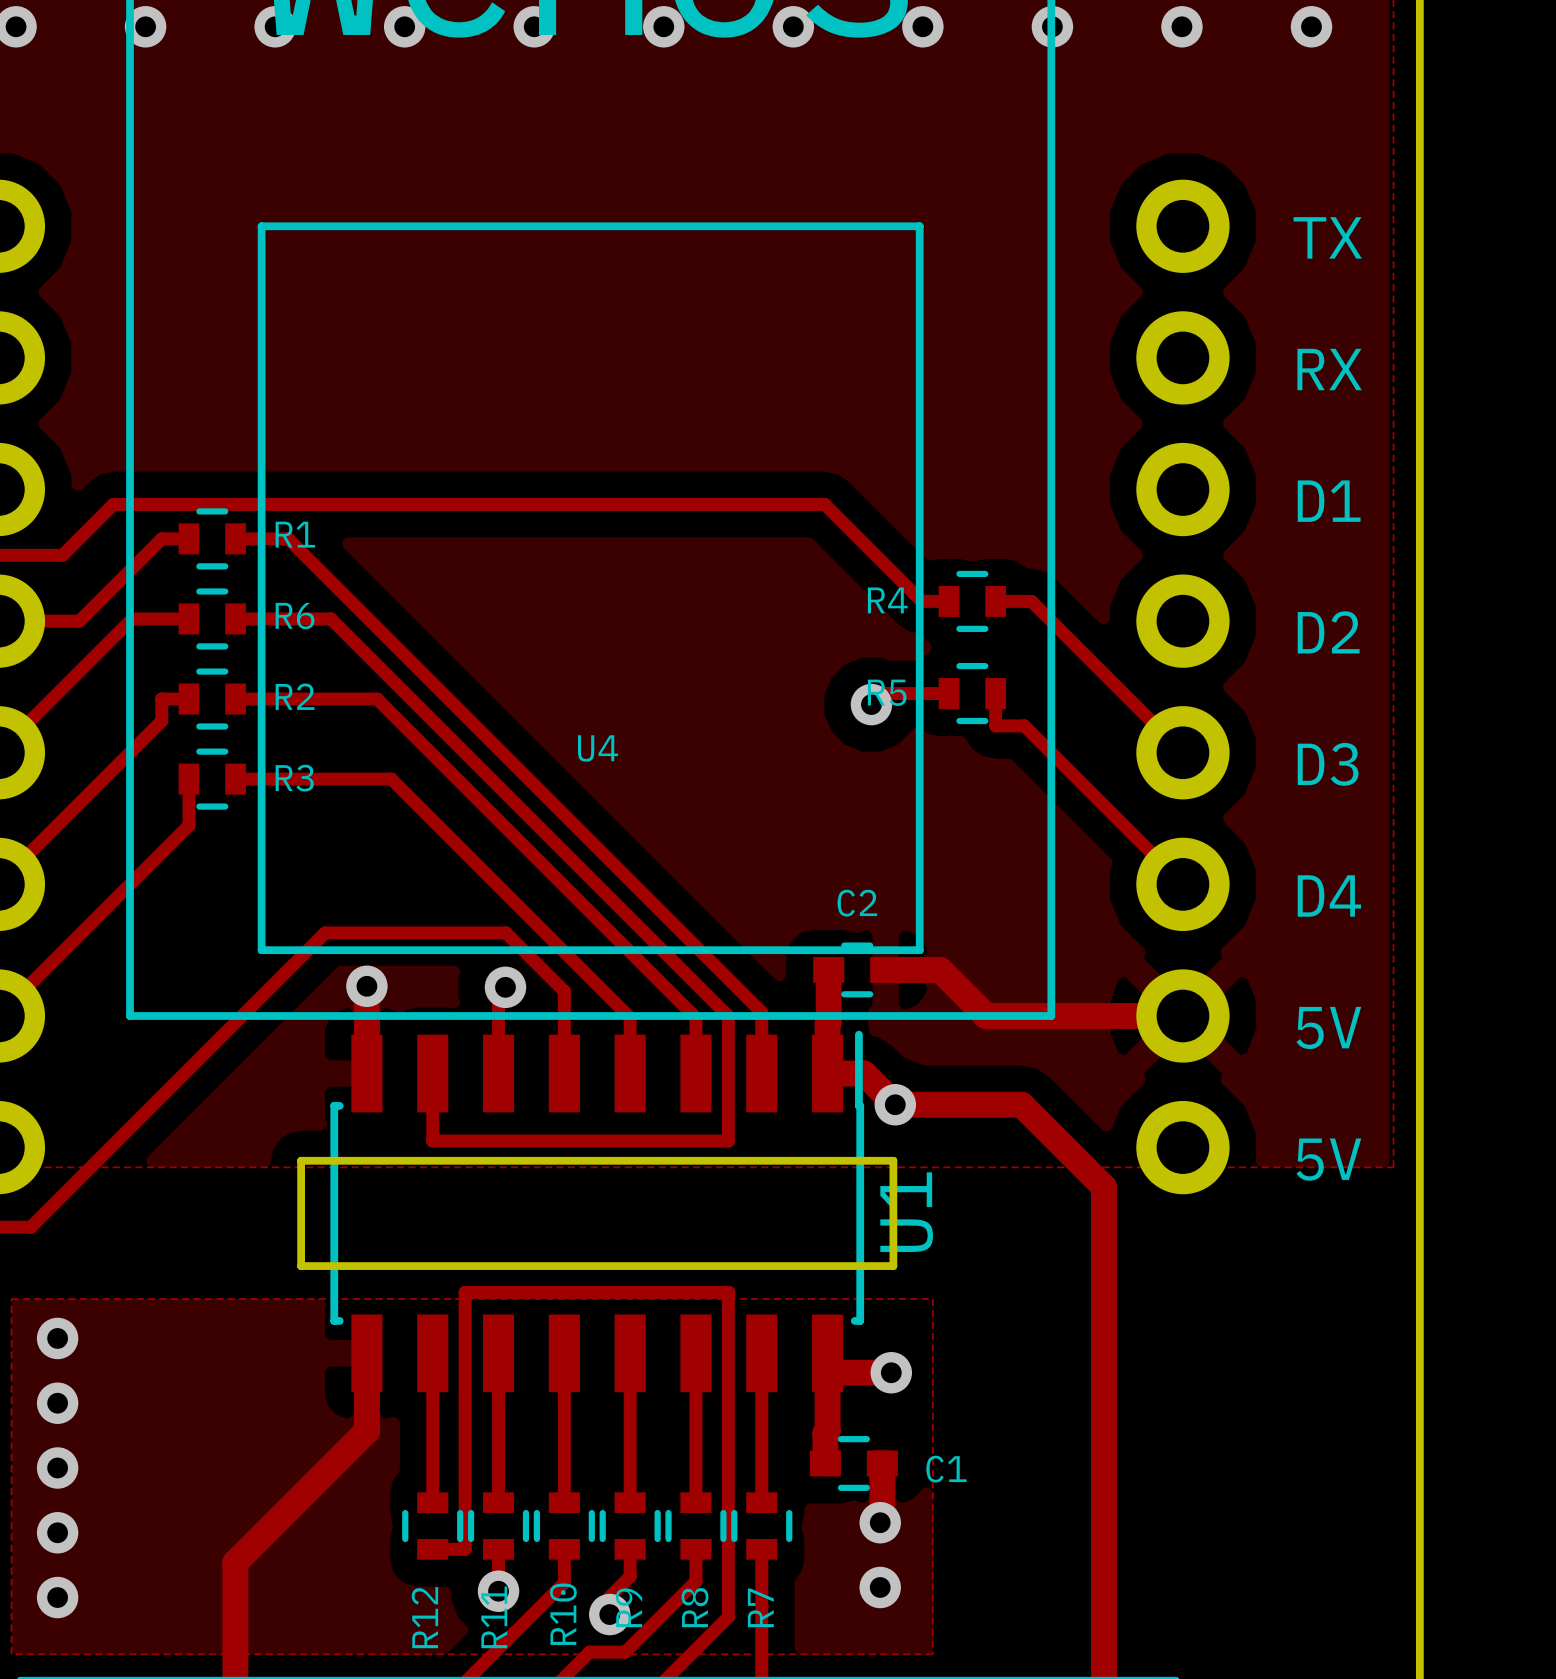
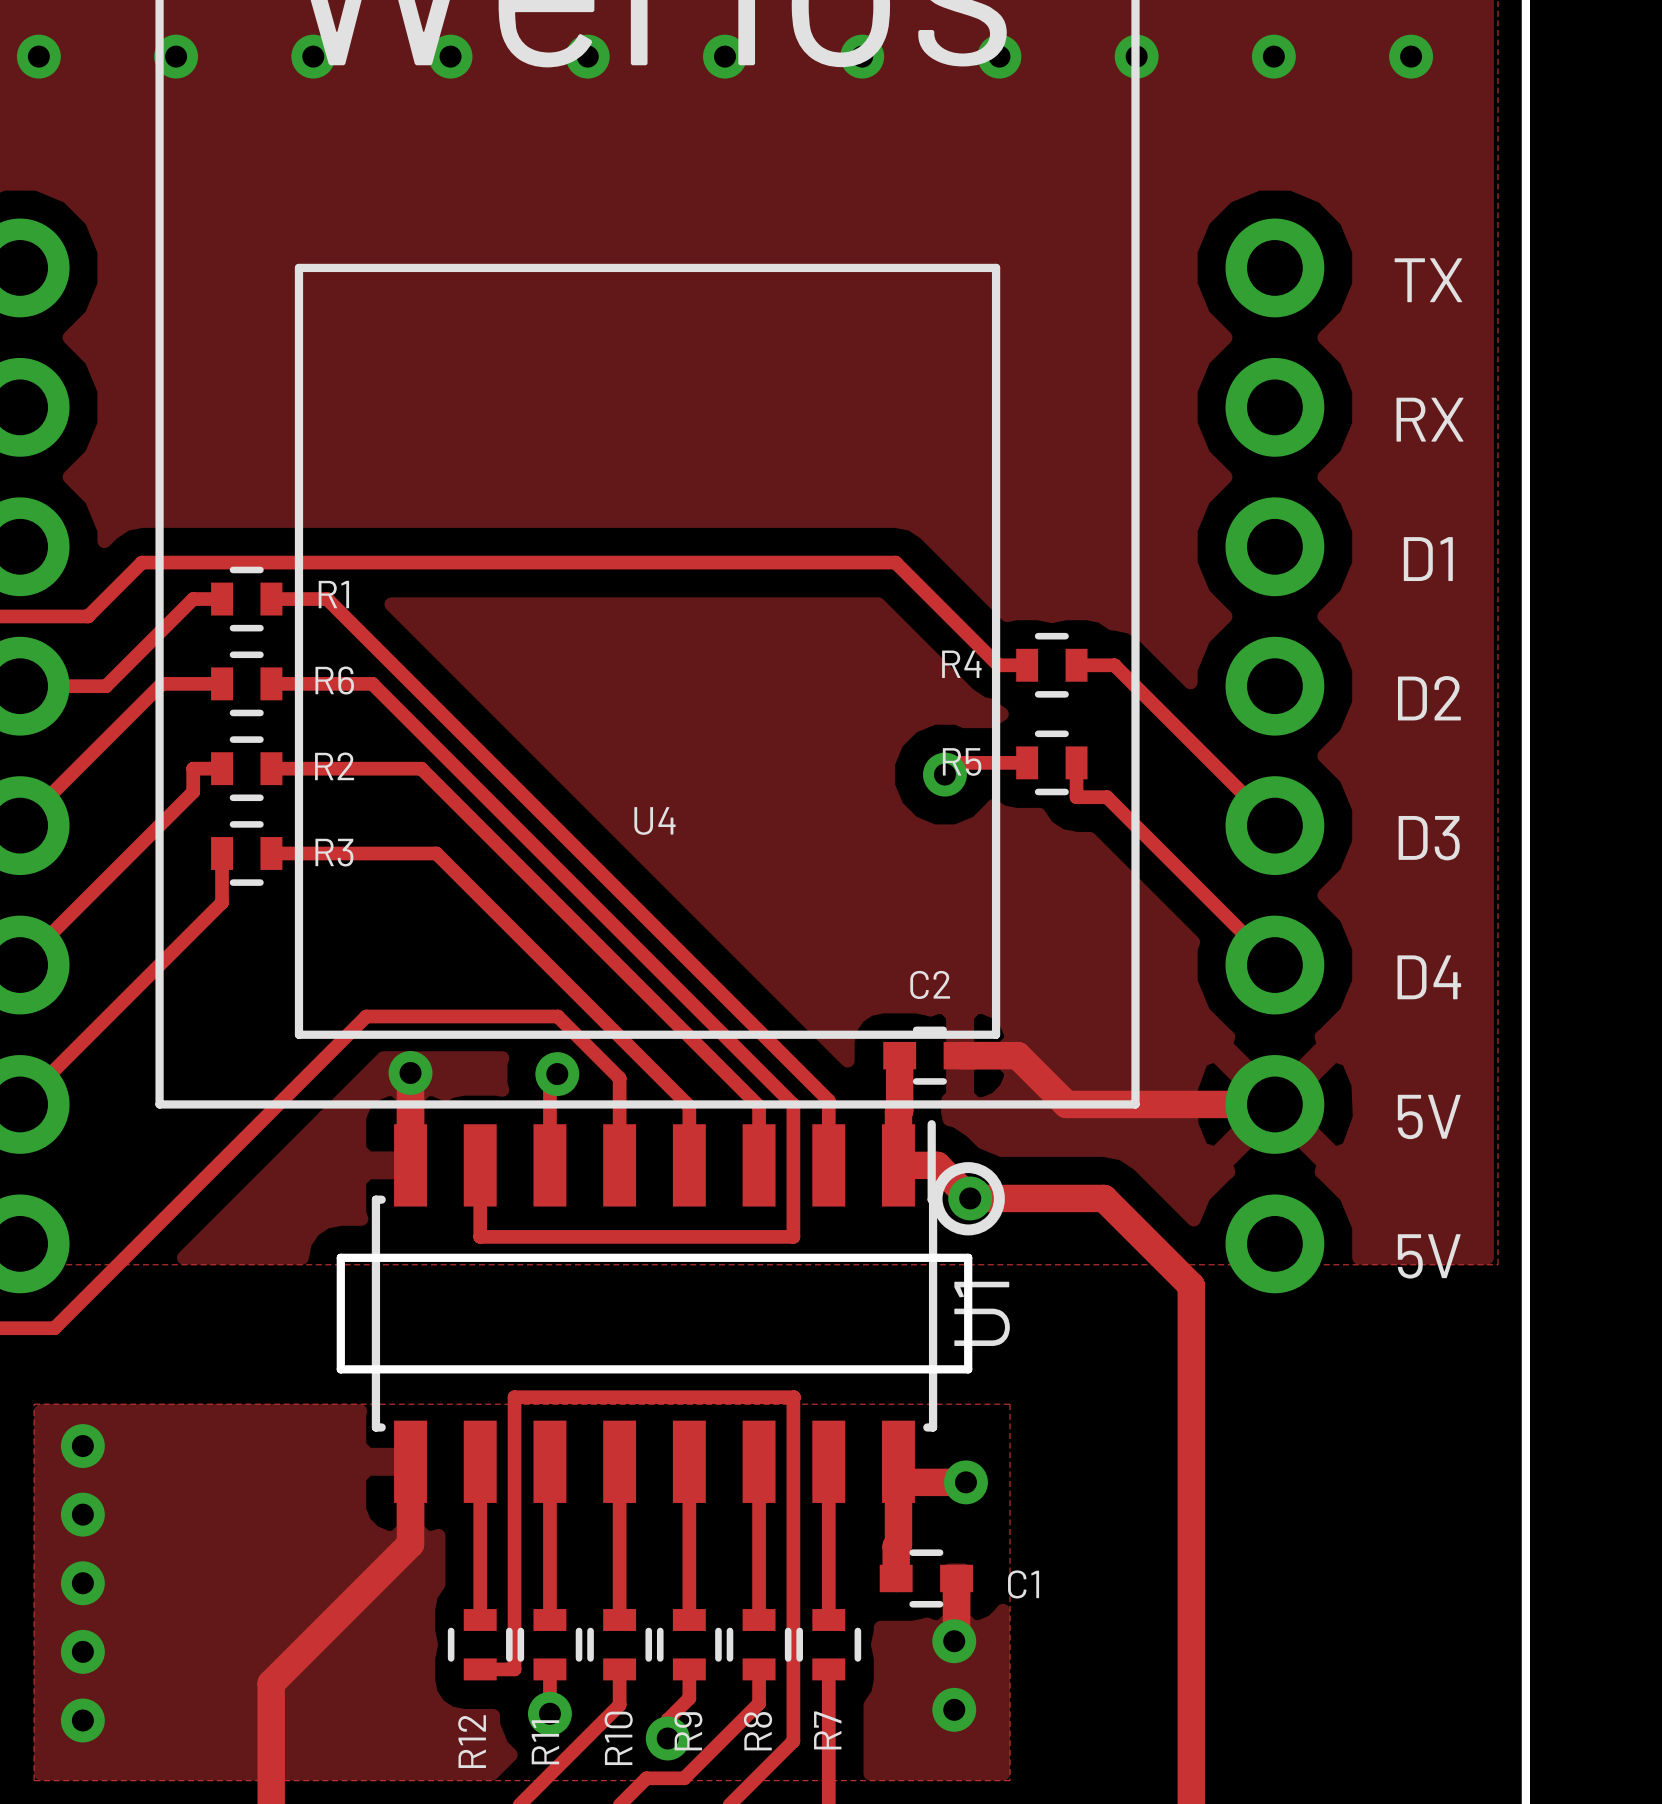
drawing: none -> [931, 1162, 1005, 1236]

